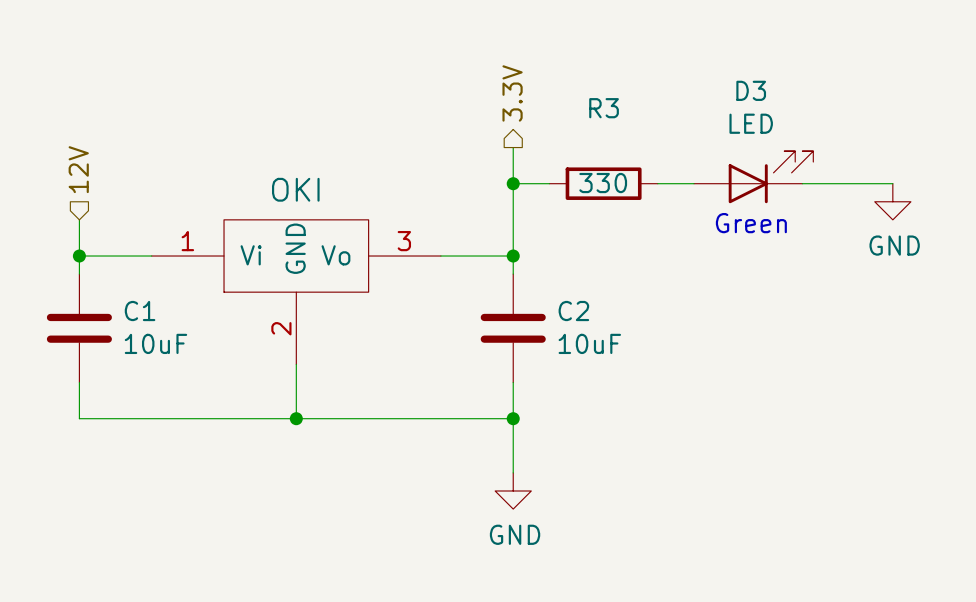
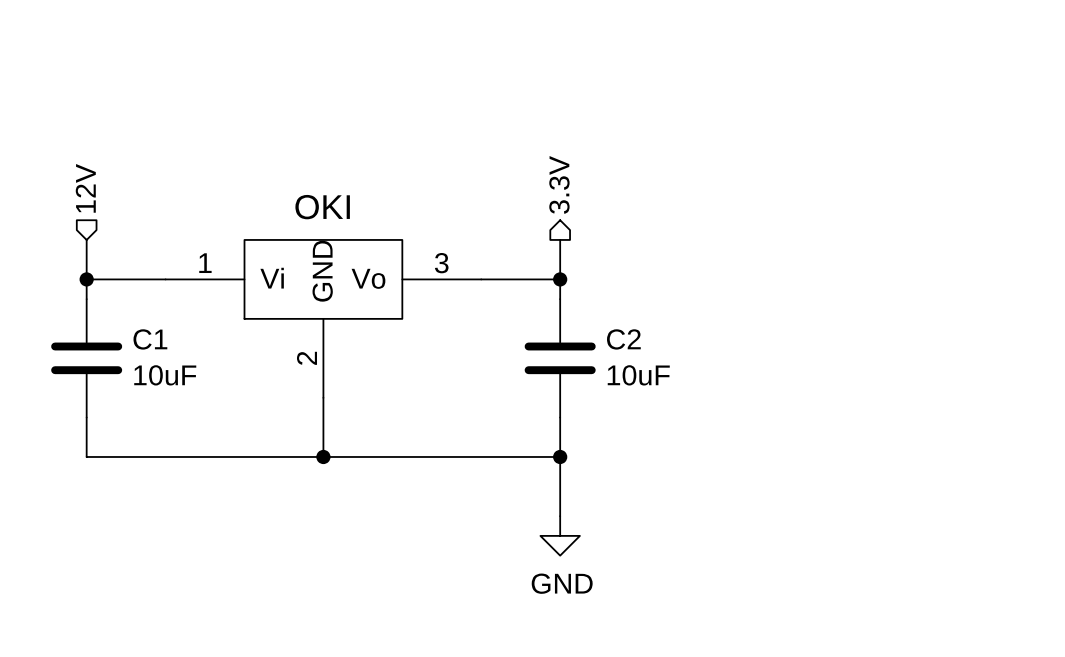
hierarchical label position: 3.3V (512, 93) -> 3.3V (559, 184)
wire: (513, 147) (513, 219) -> none
D3: LED (753, 177) -> none
wire: (513, 183) (549, 183) -> none
junction: (513, 183) -> none
R3: 330 (603, 183) -> none
wire: (657, 183) (693, 183) -> none
wire: (802, 183) (892, 183) -> none
power symbol: GND (892, 201) -> none
text: Green (751, 223) -> none

